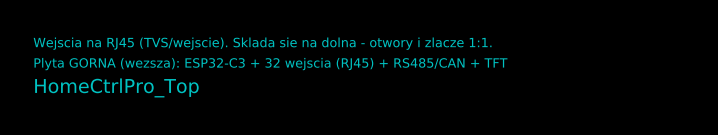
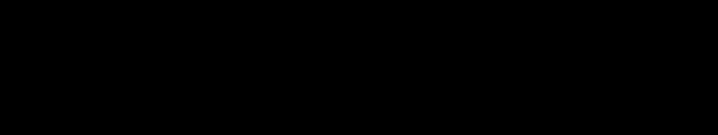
text: Wejscia na RJ45 (TVS/wejscie). Sklada sie na dolna - otwory i zlacze 1:1. (262, 43) -> none
text: Plyta GORNA (wezsza): ESP32-C3 + 32 wejscia (RJ45) + RS485/CAN + TFT (270, 64) -> none
text: HomeCtrlPro_Top (116, 87) -> none

